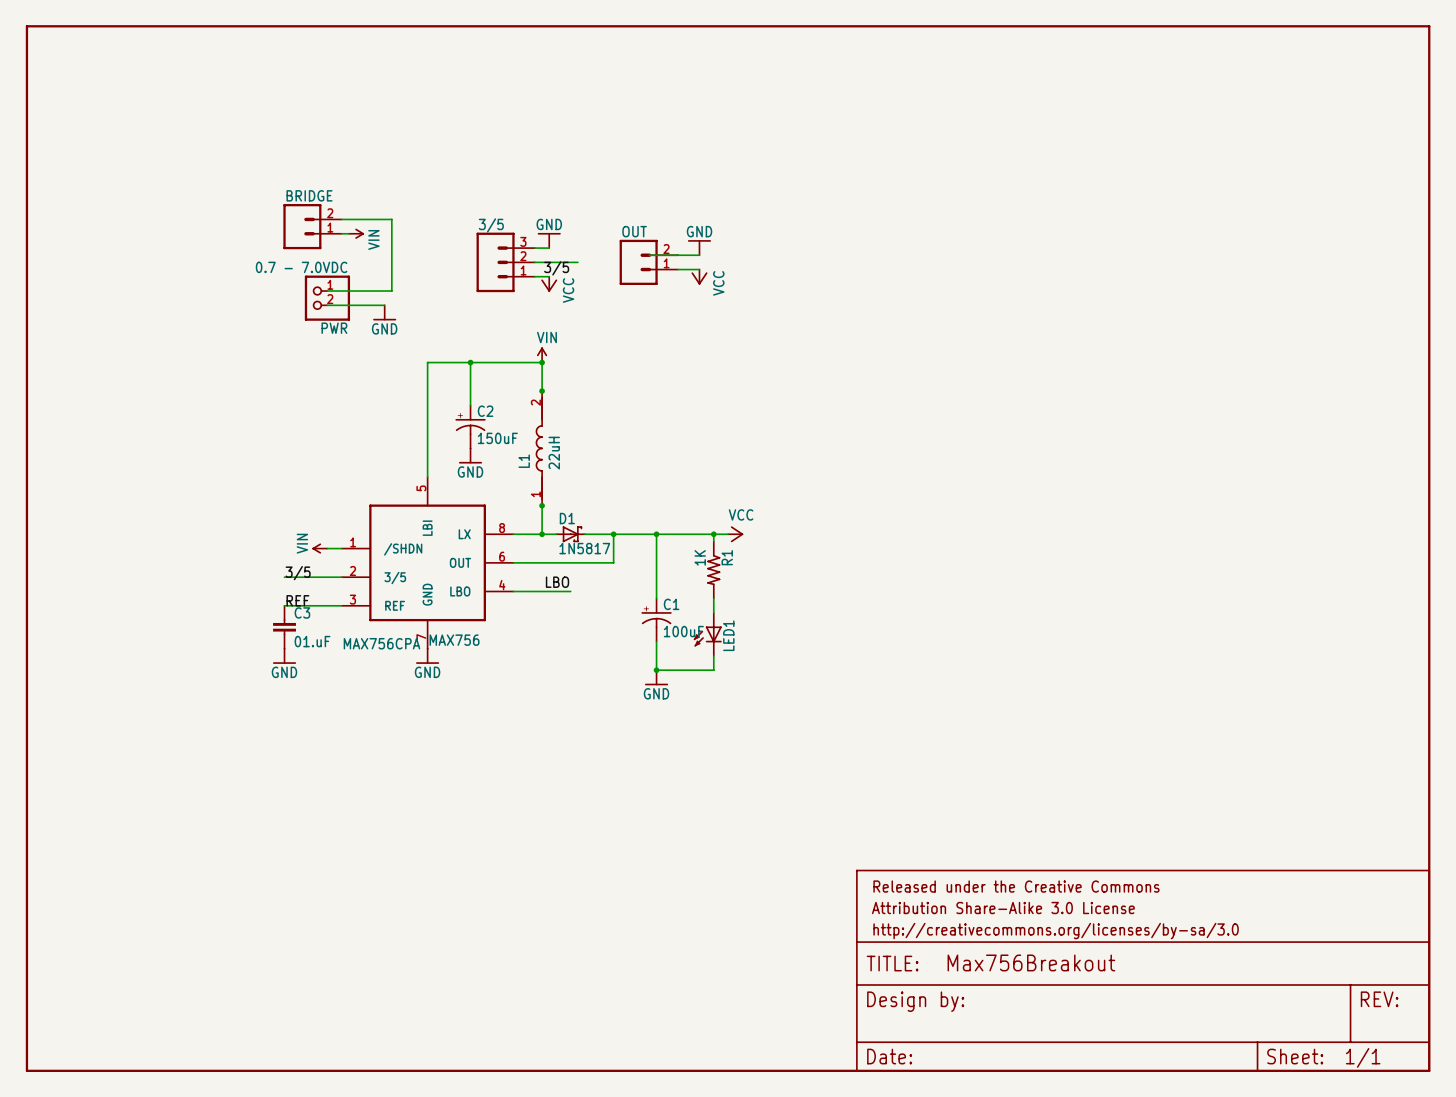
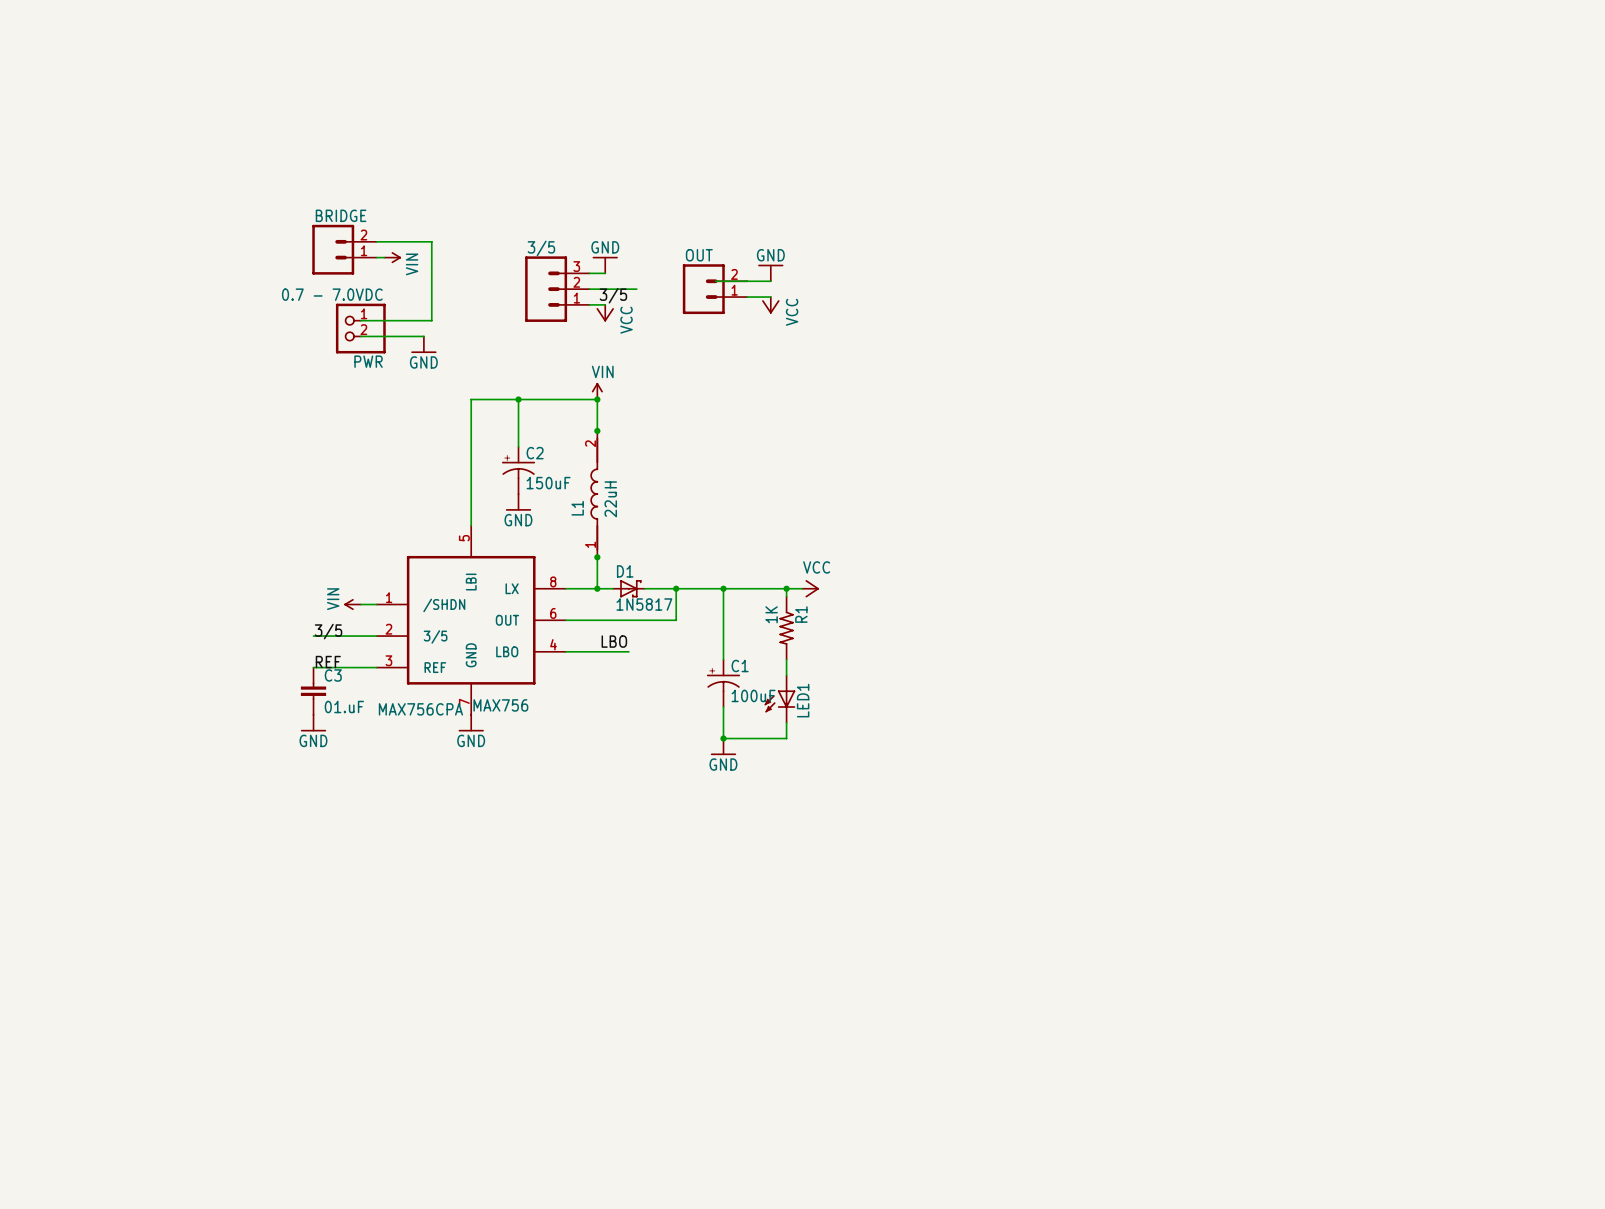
part: (728, 548) -> none
part: (1143, 970) -> none

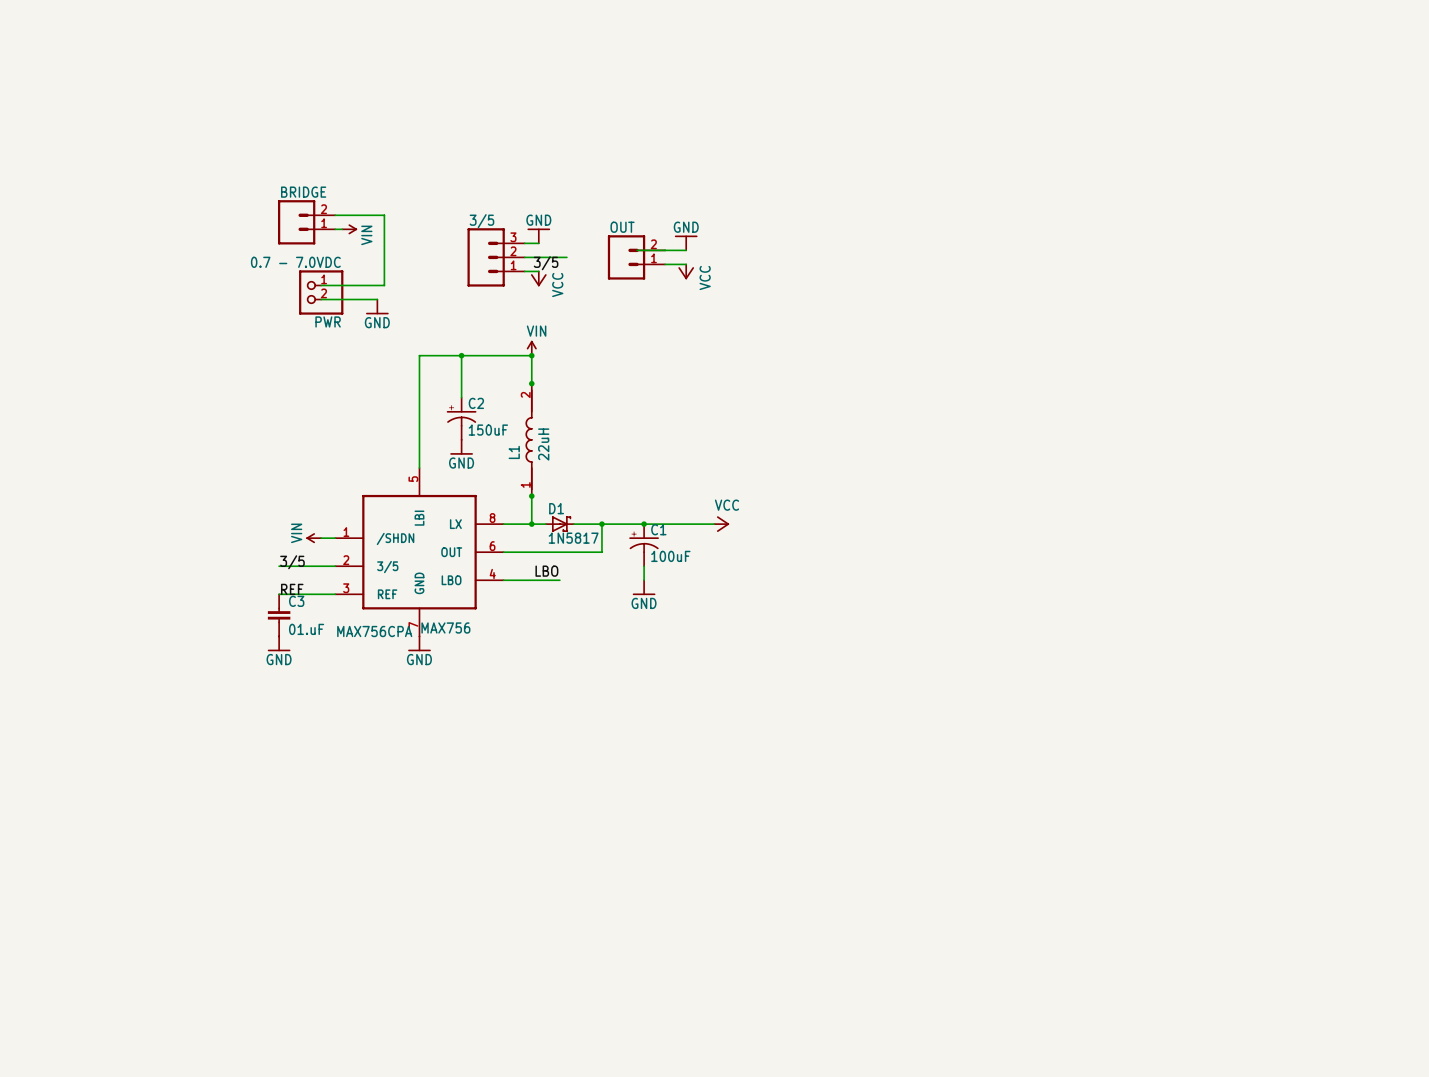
wire: (786, 588) (786, 596) -> none
junction: (786, 588) -> none
R1: 1K (786, 628) -> none
wire: (786, 659) (786, 675) -> none
C1 position: (723, 683) -> (644, 545)
LED1: (780, 699) -> none
wire: (723, 707) (723, 738) (786, 738) (786, 722) -> none
junction: (723, 738) -> none
power symbol position: GND (723, 746) -> GND (644, 587)

